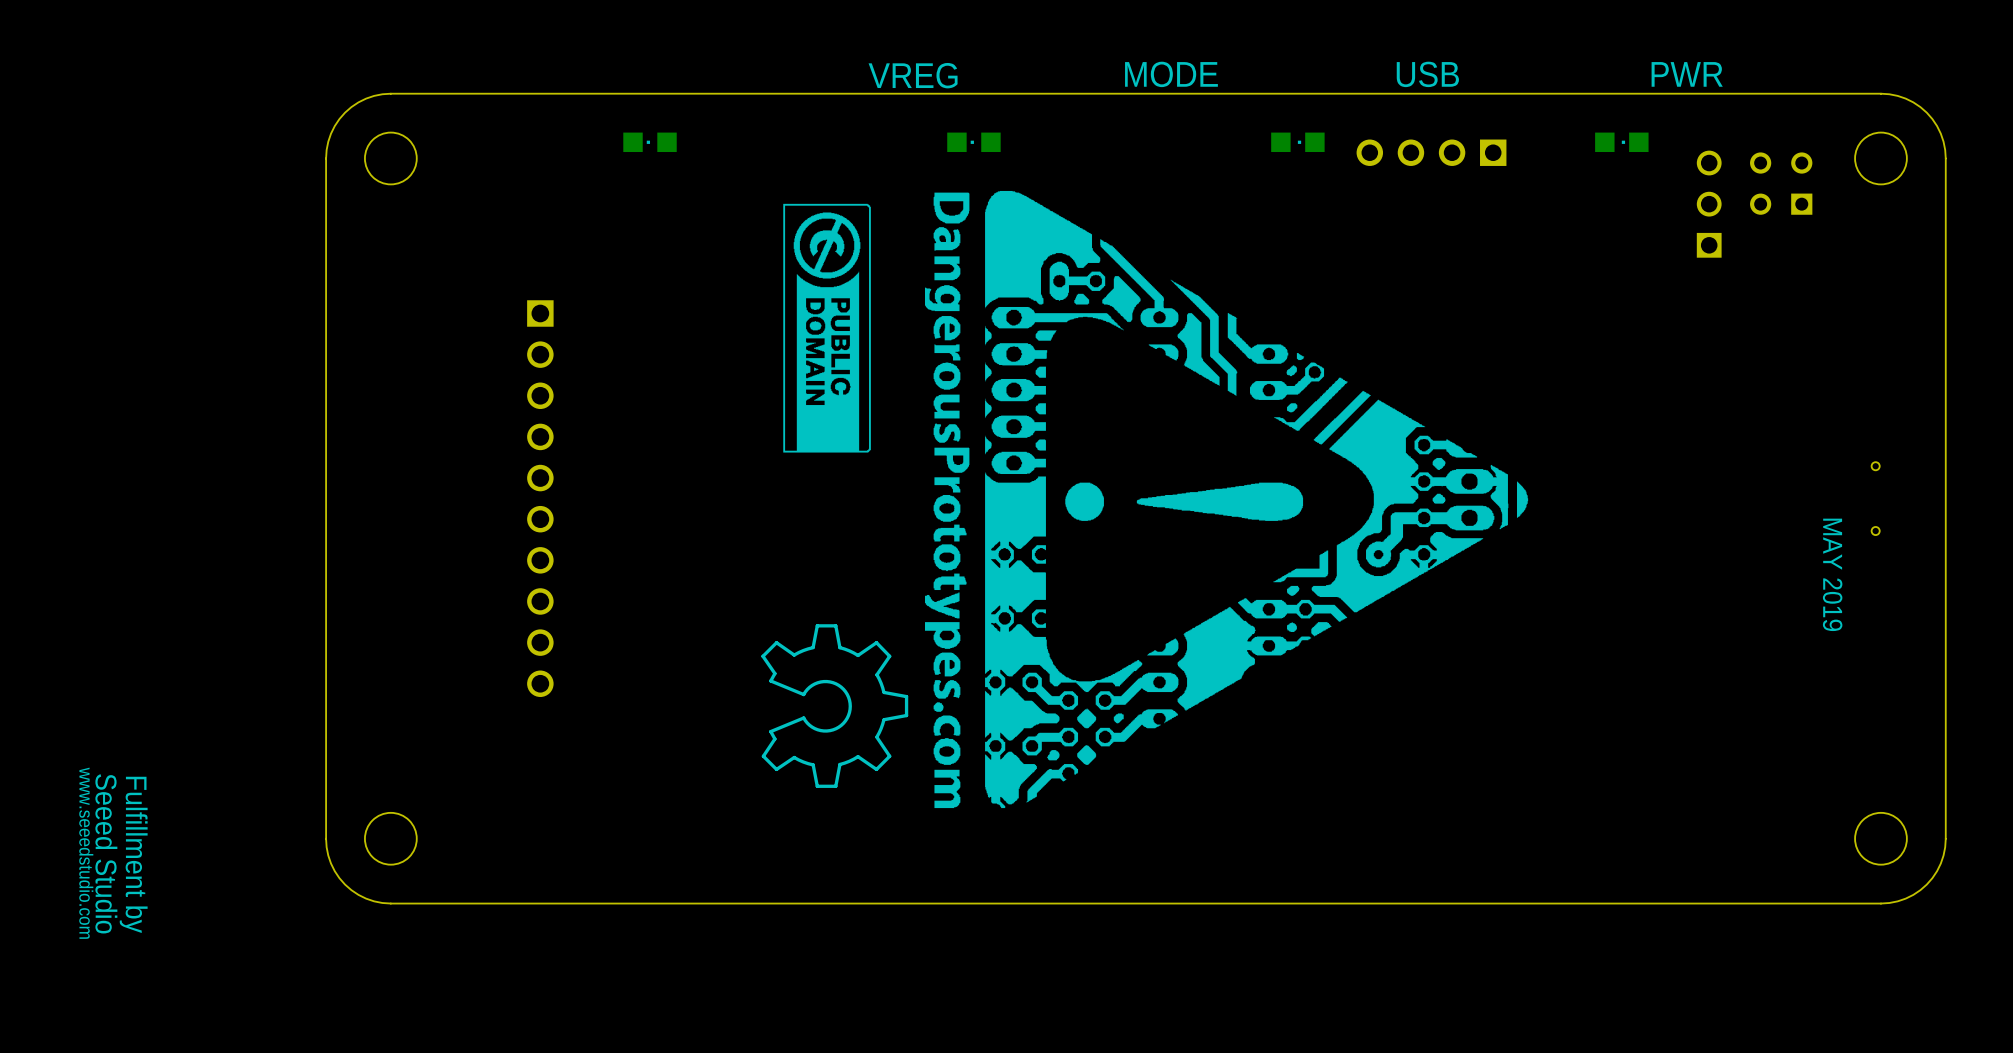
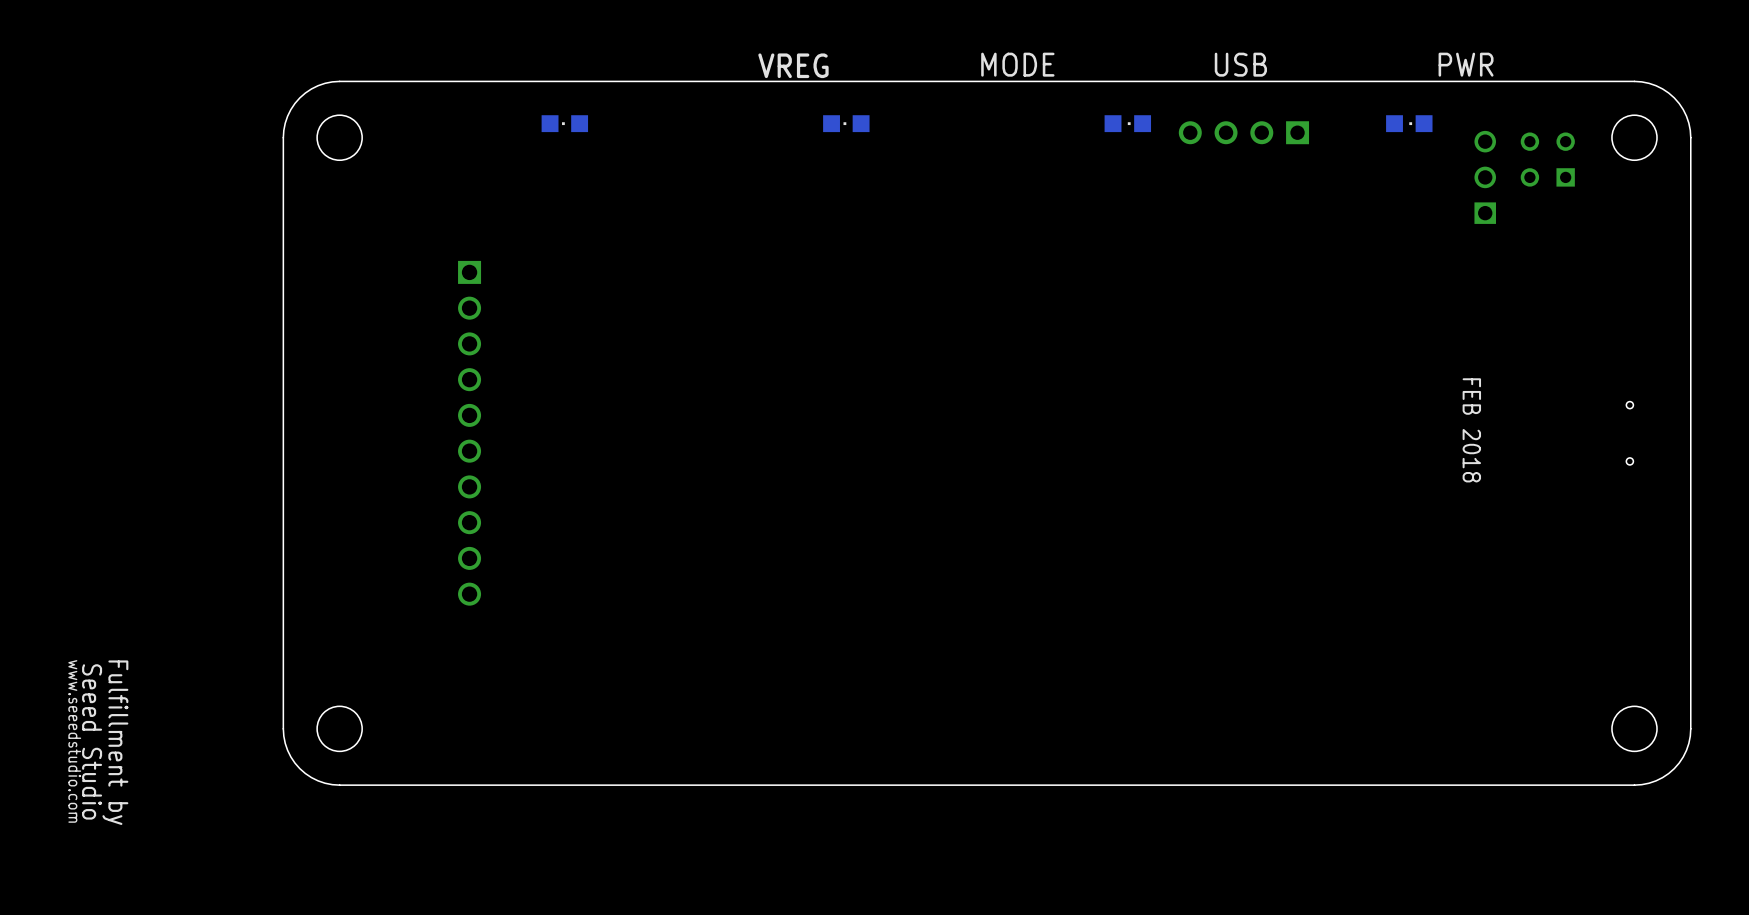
drawing: [761, 190, 1529, 809] -> none
drawing: [783, 203, 871, 453] -> none
text: none -> FEB 2018 (1471, 430)
text: MAY 2019 (1832, 574) -> none

